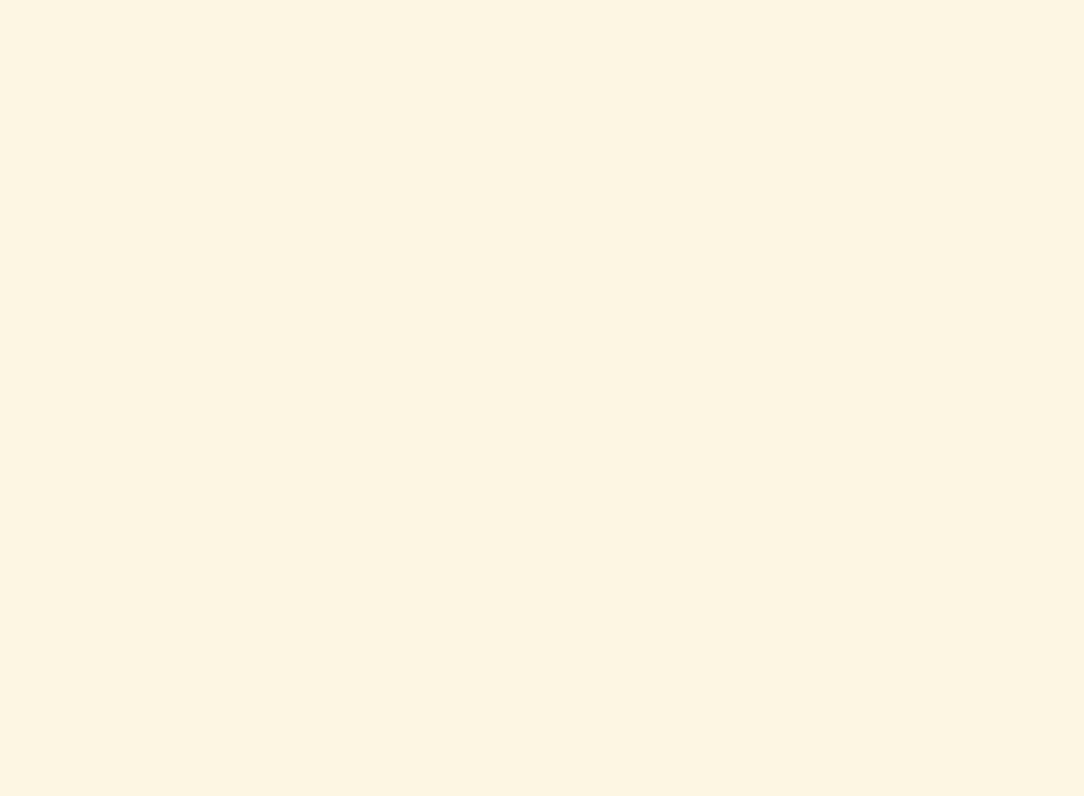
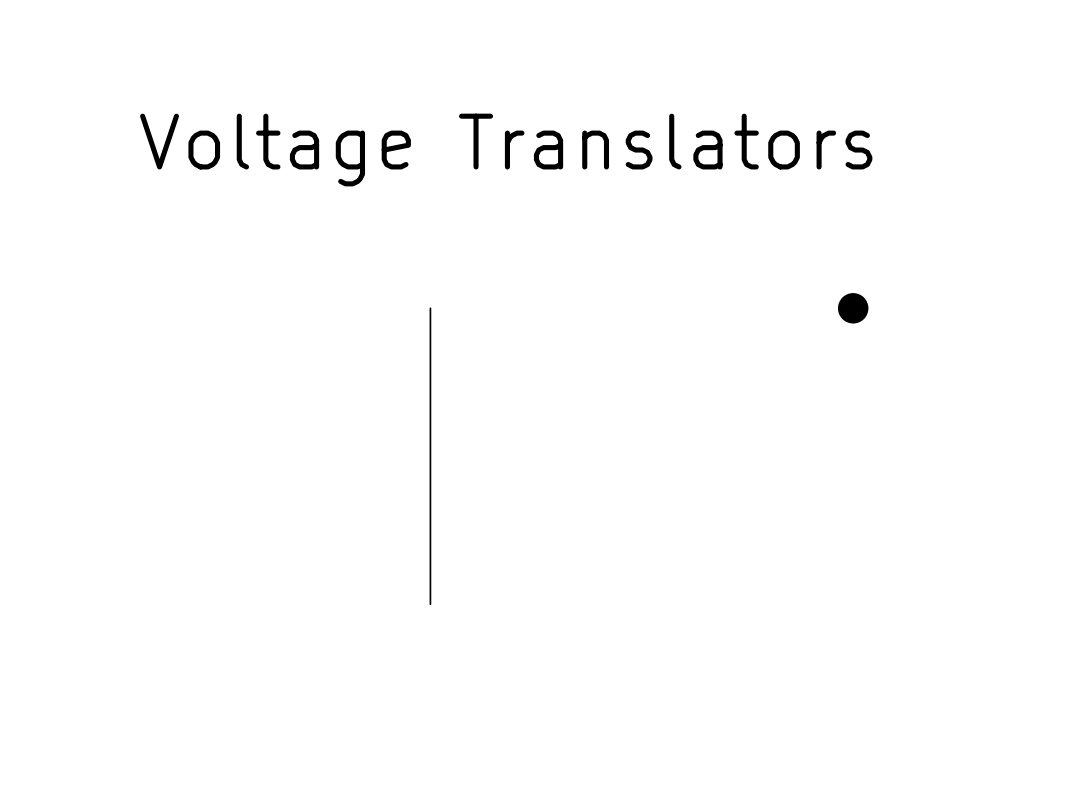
text: none -> Voltage Translators (506, 150)
wire: none -> (430, 308) (430, 604)
junction: none -> (853, 308)

